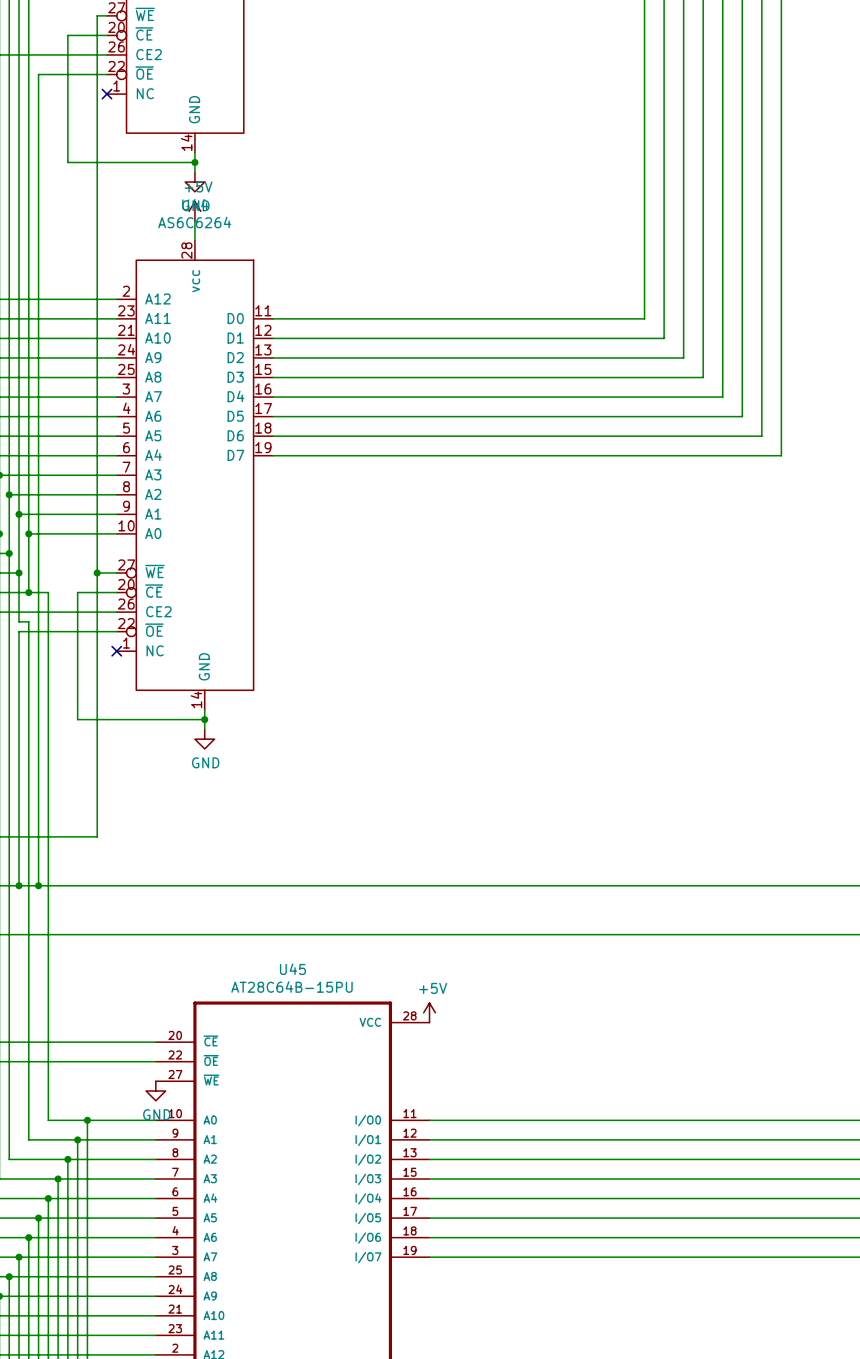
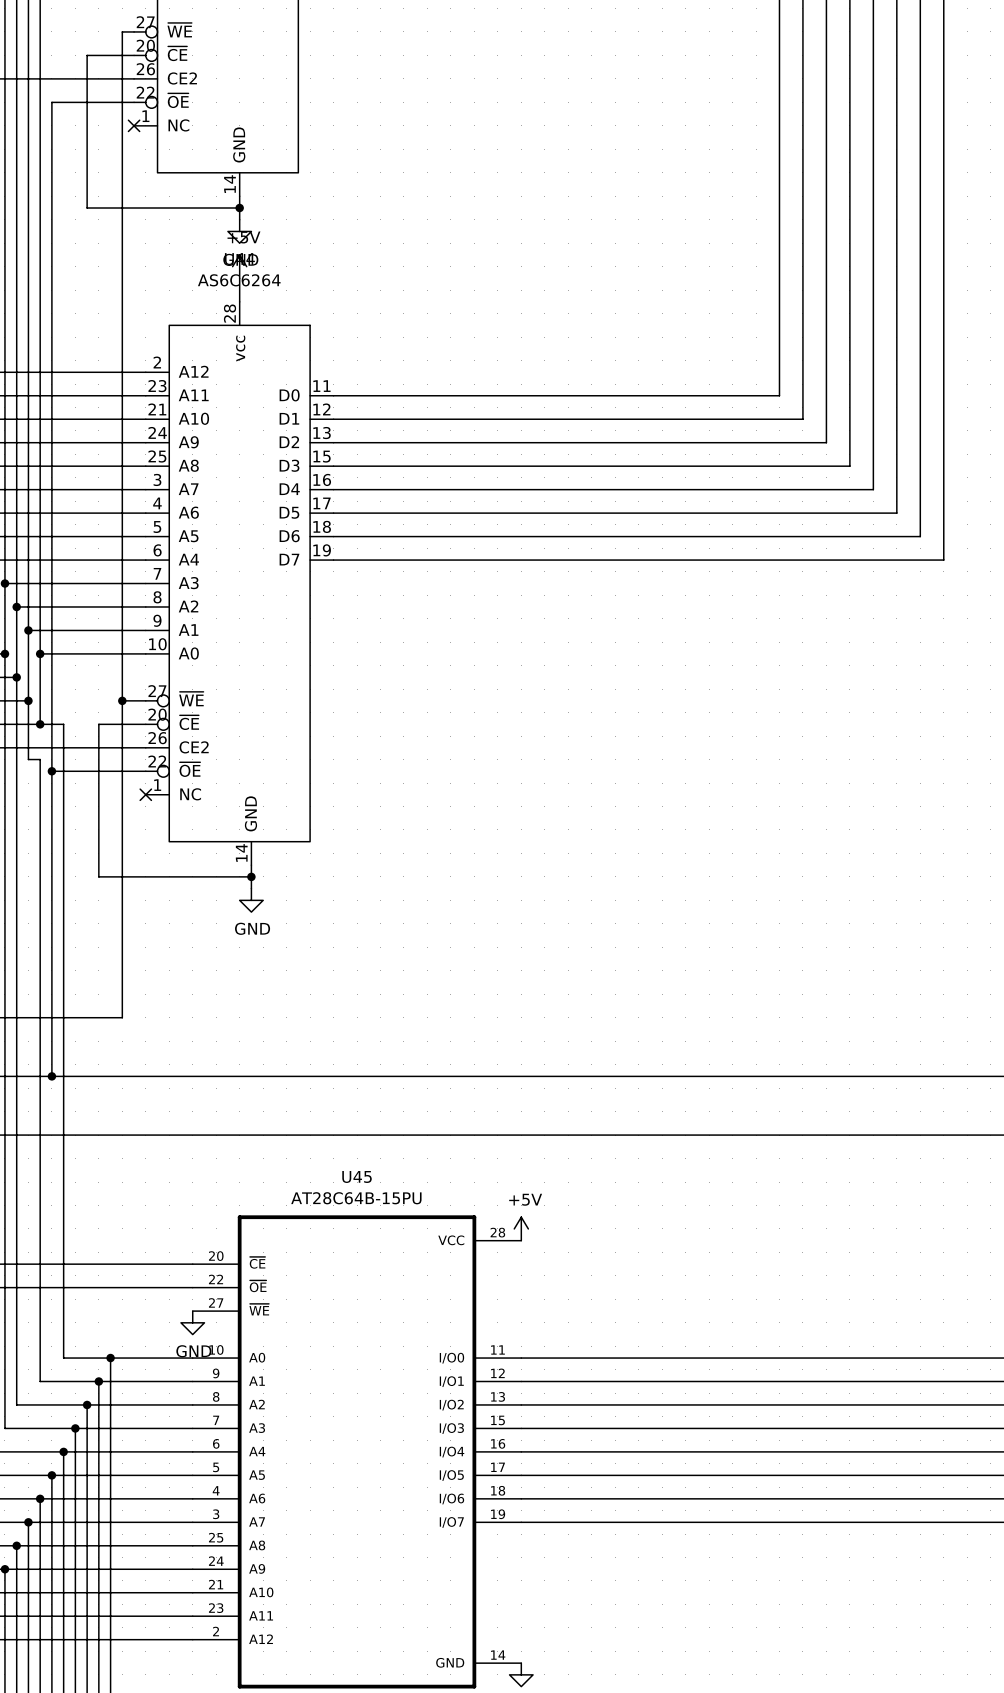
wire: (38, 631) (19, 631) (19, 885) -> none
junction: none -> (51, 771)
junction: (19, 885) -> none

